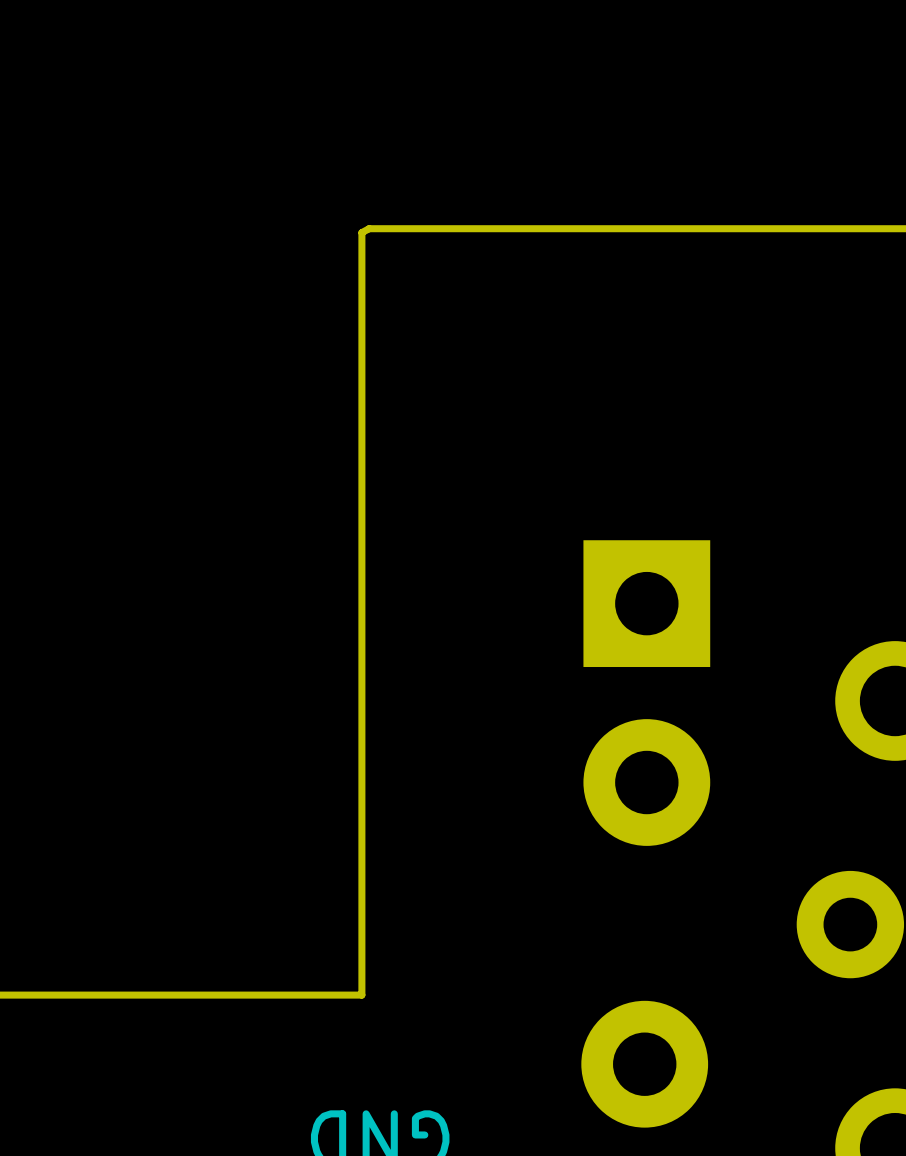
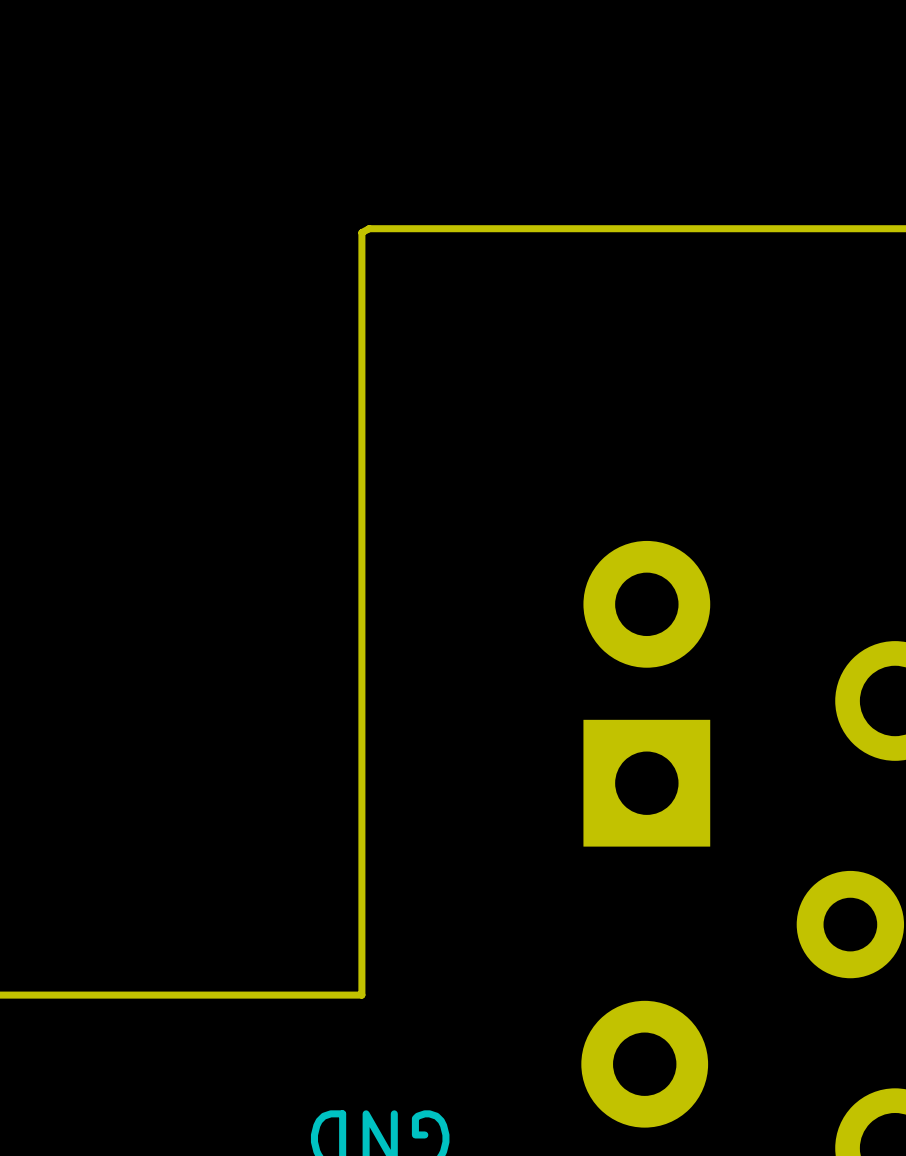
part rotation: 0° (646, 693) -> 180° (646, 693)

